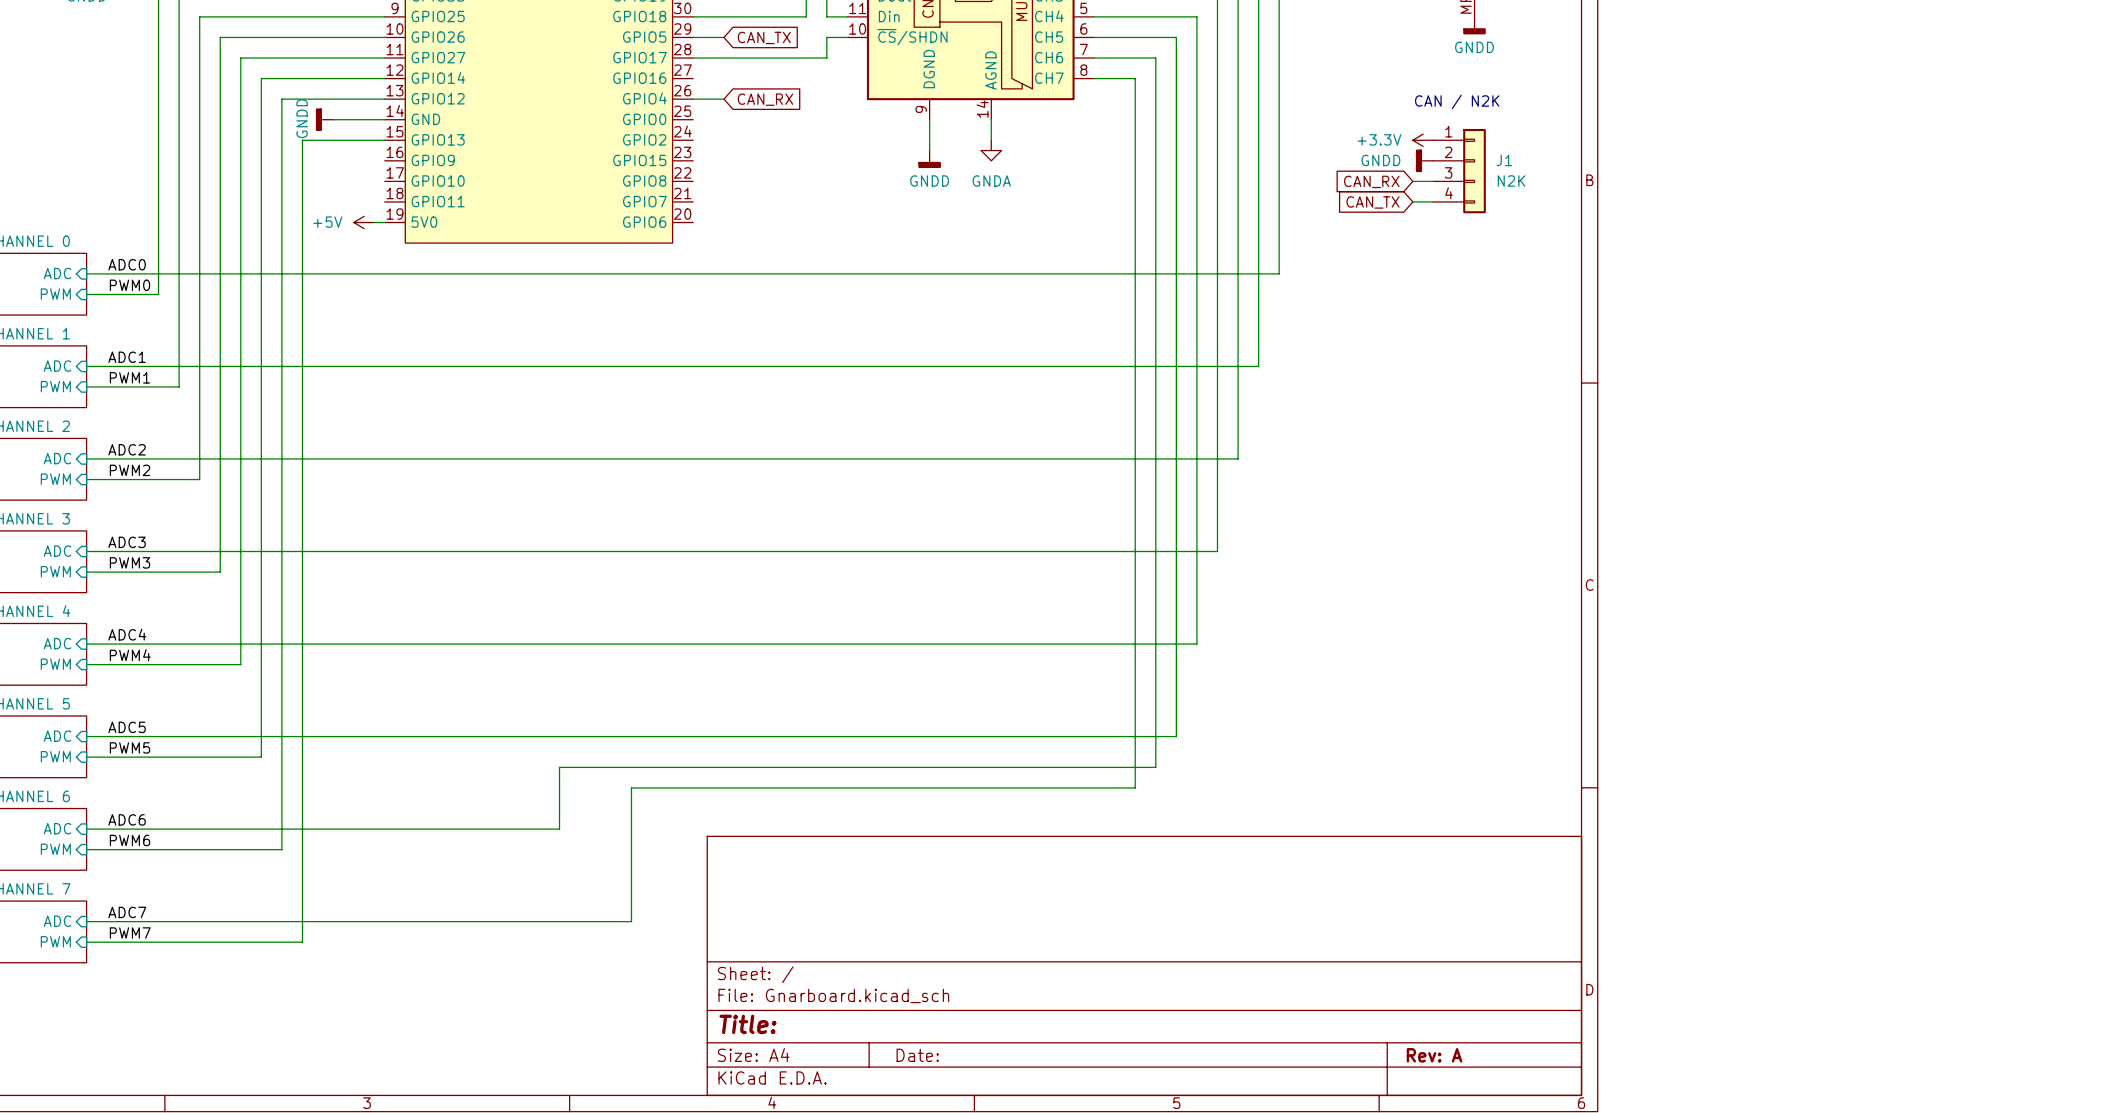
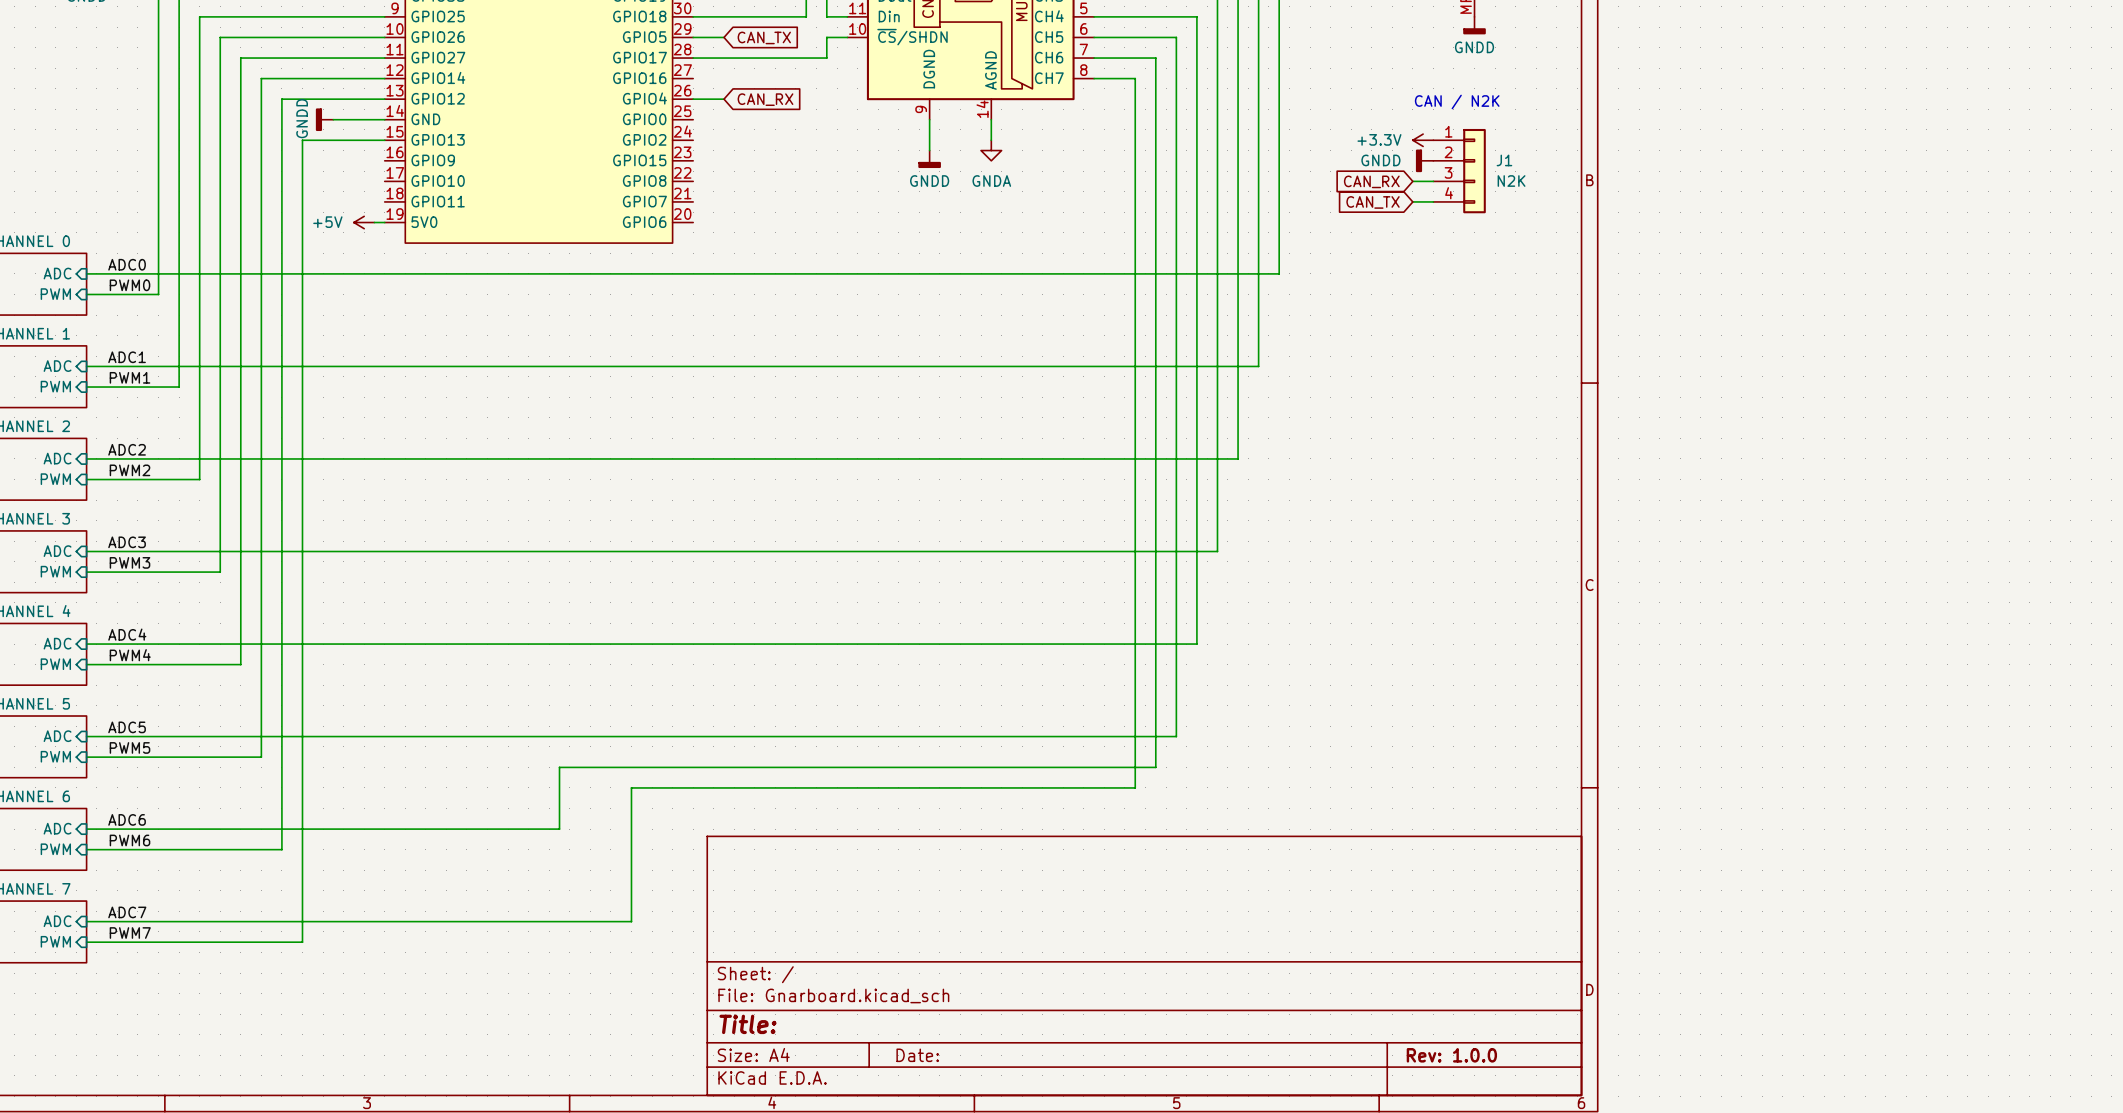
title block: Rev: A (1434, 1055) -> Rev: 1.0.0 (1451, 1055)

